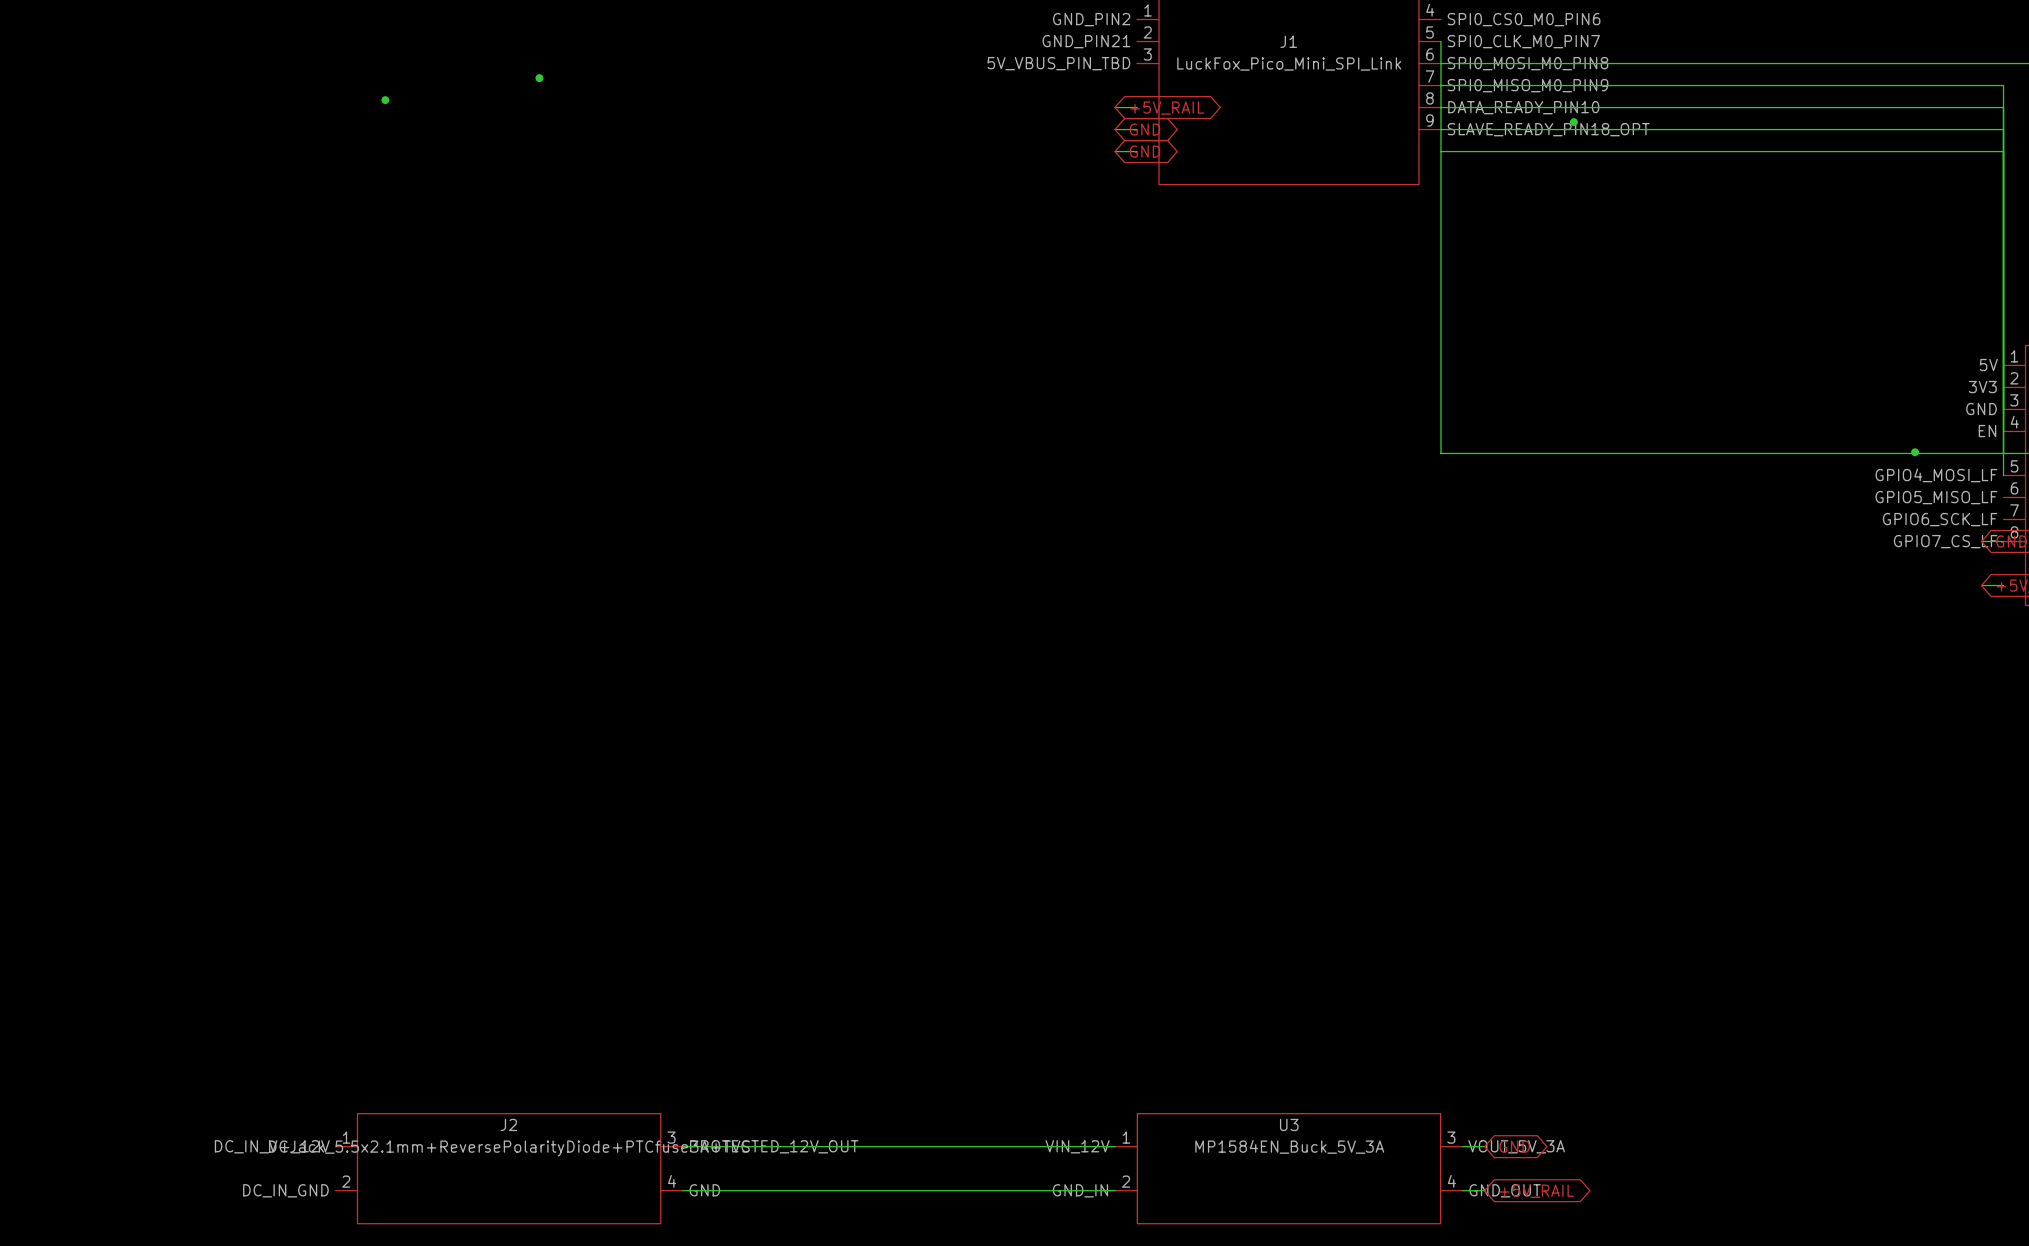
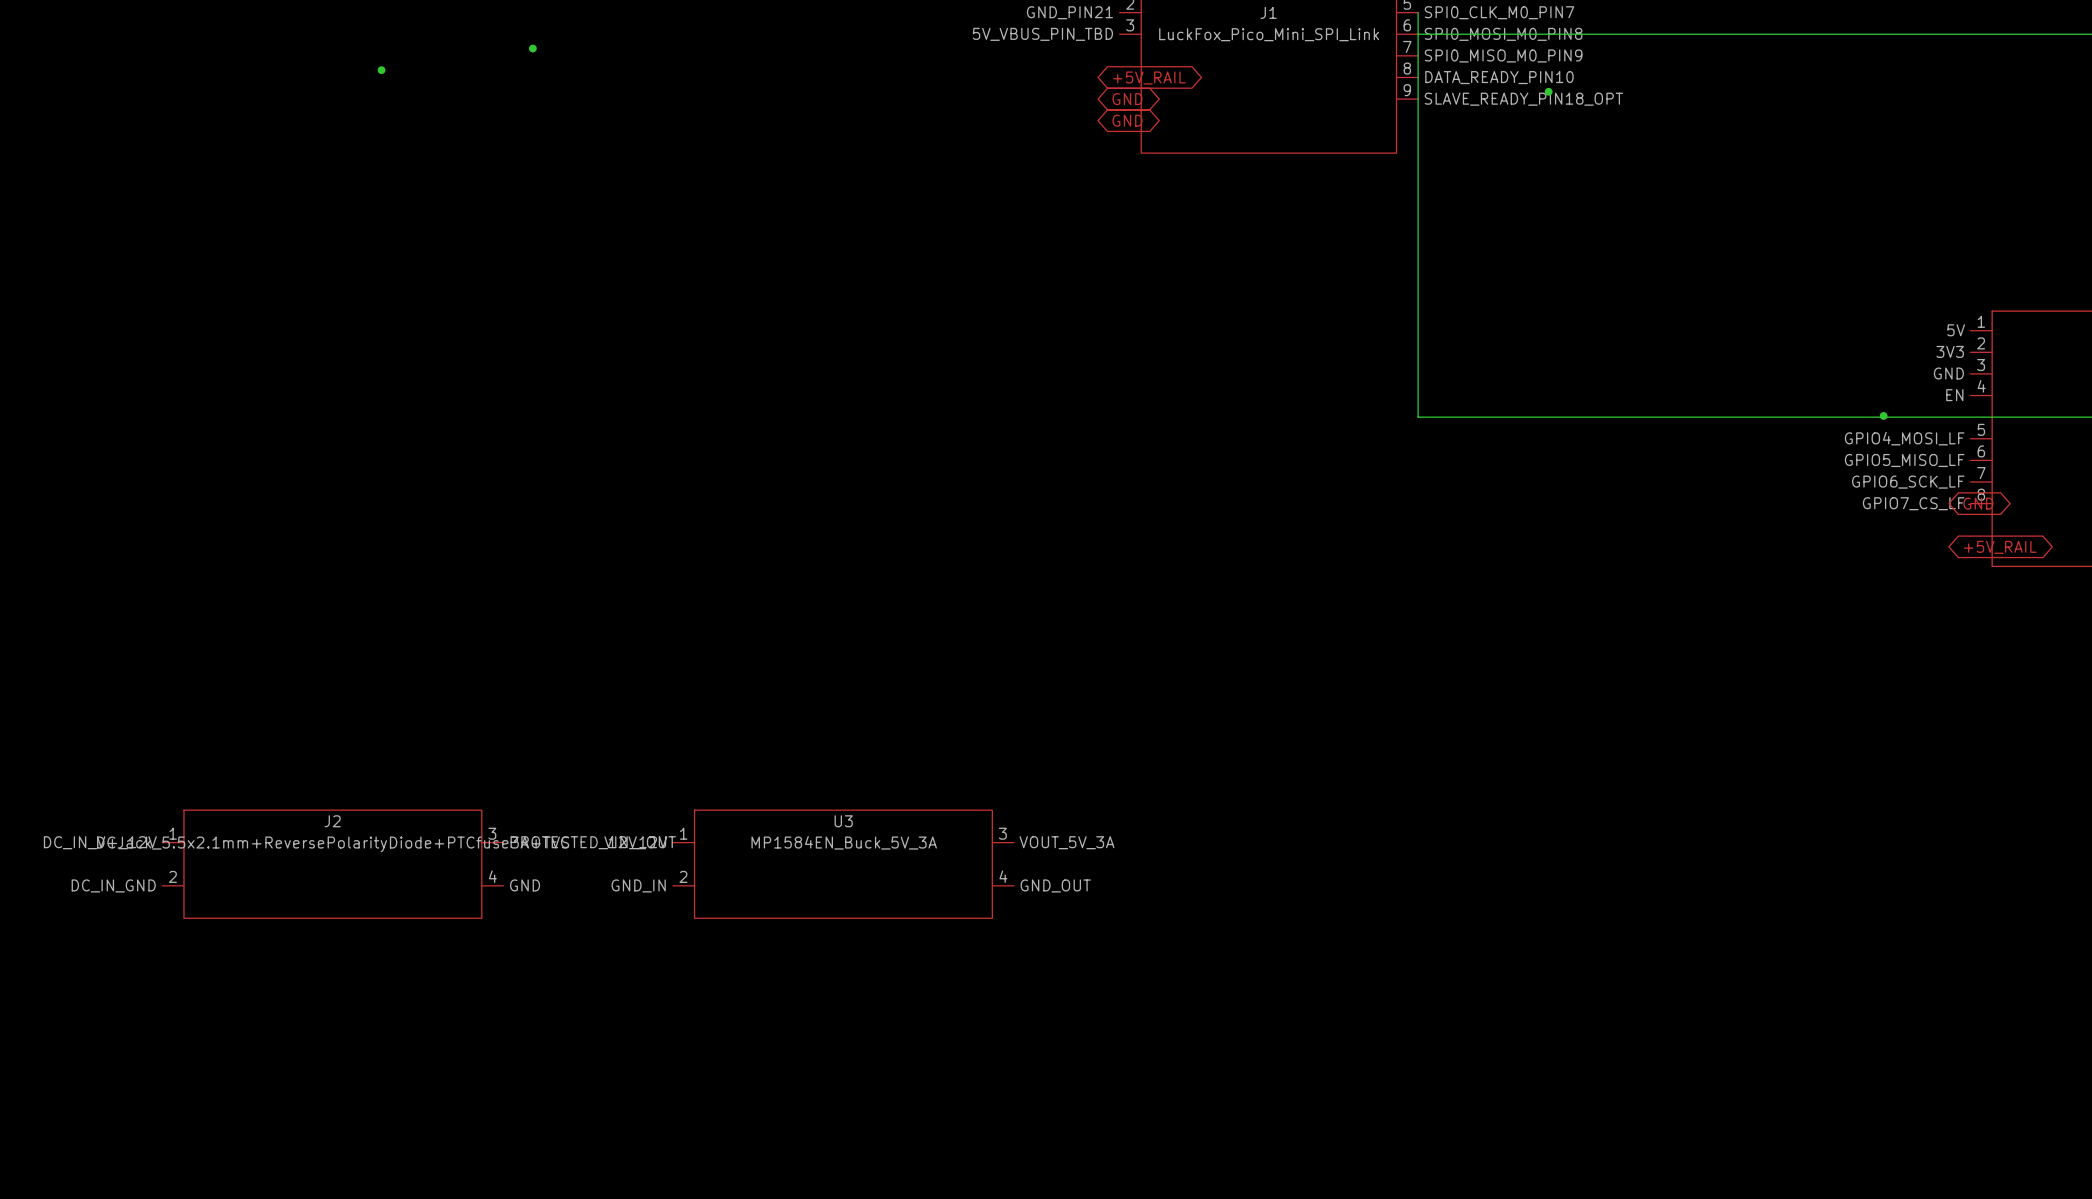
wire: (1440, 85) (2003, 85) (2003, 475) -> none
wire: (1114, 107) (1137, 107) -> none
wire: (1440, 107) (2003, 107) -> none
wire: (1114, 129) (1137, 129) -> none
wire: (1440, 129) (2003, 129) -> none
wire: (1114, 151) (1137, 151) -> none
wire: (1440, 151) (2003, 151) -> none
wire: (1981, 541) (2003, 541) -> none
wire: (1981, 585) (2003, 585) -> none
wire: (682, 1146) (1115, 1146) -> none
wire: (1462, 1146) (1484, 1146) -> none
global label: GND (1514, 1146) -> none
J2 position: (509, 1168) -> (332, 864)
U3 position: (1288, 1168) -> (843, 864)
wire: (682, 1190) (1115, 1190) -> none
wire: (1462, 1190) (1484, 1190) -> none
global label: +5V_RAIL (1536, 1191) -> none

